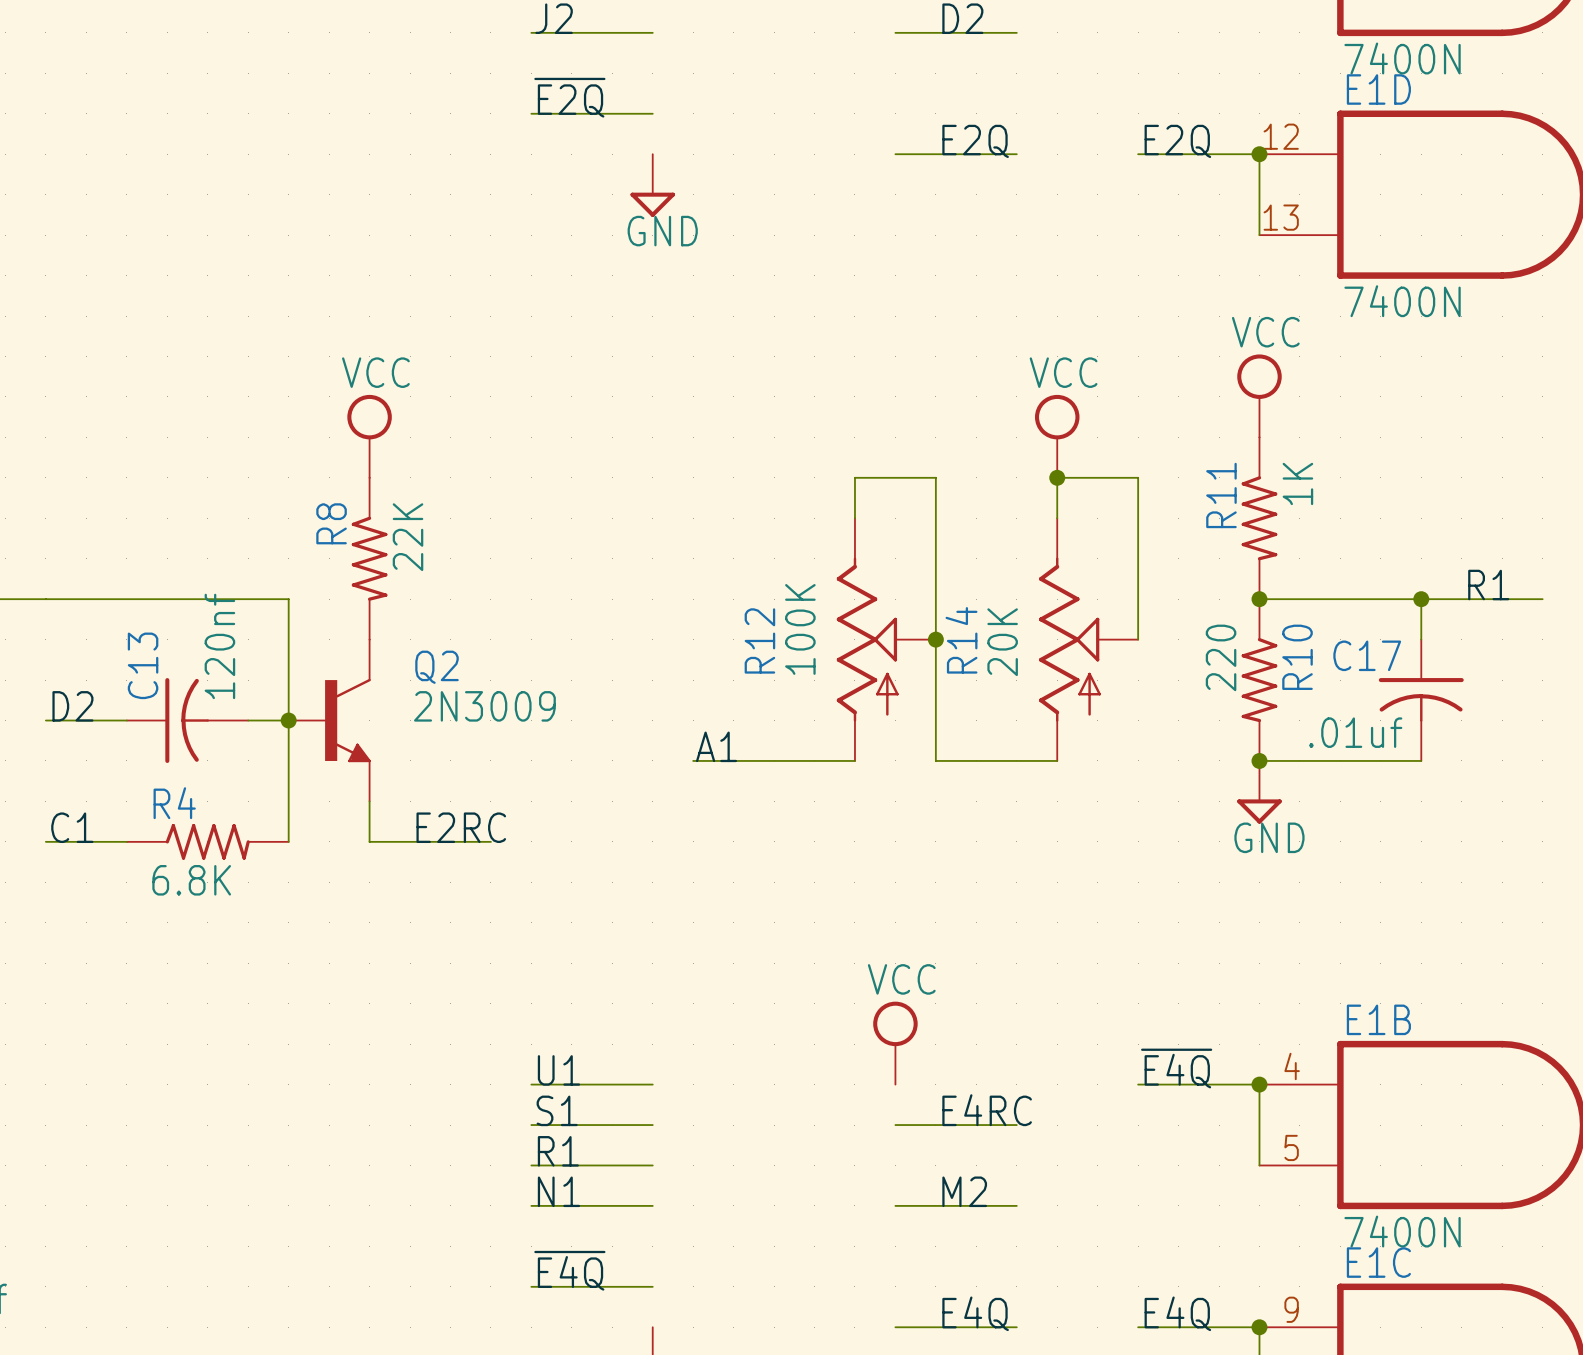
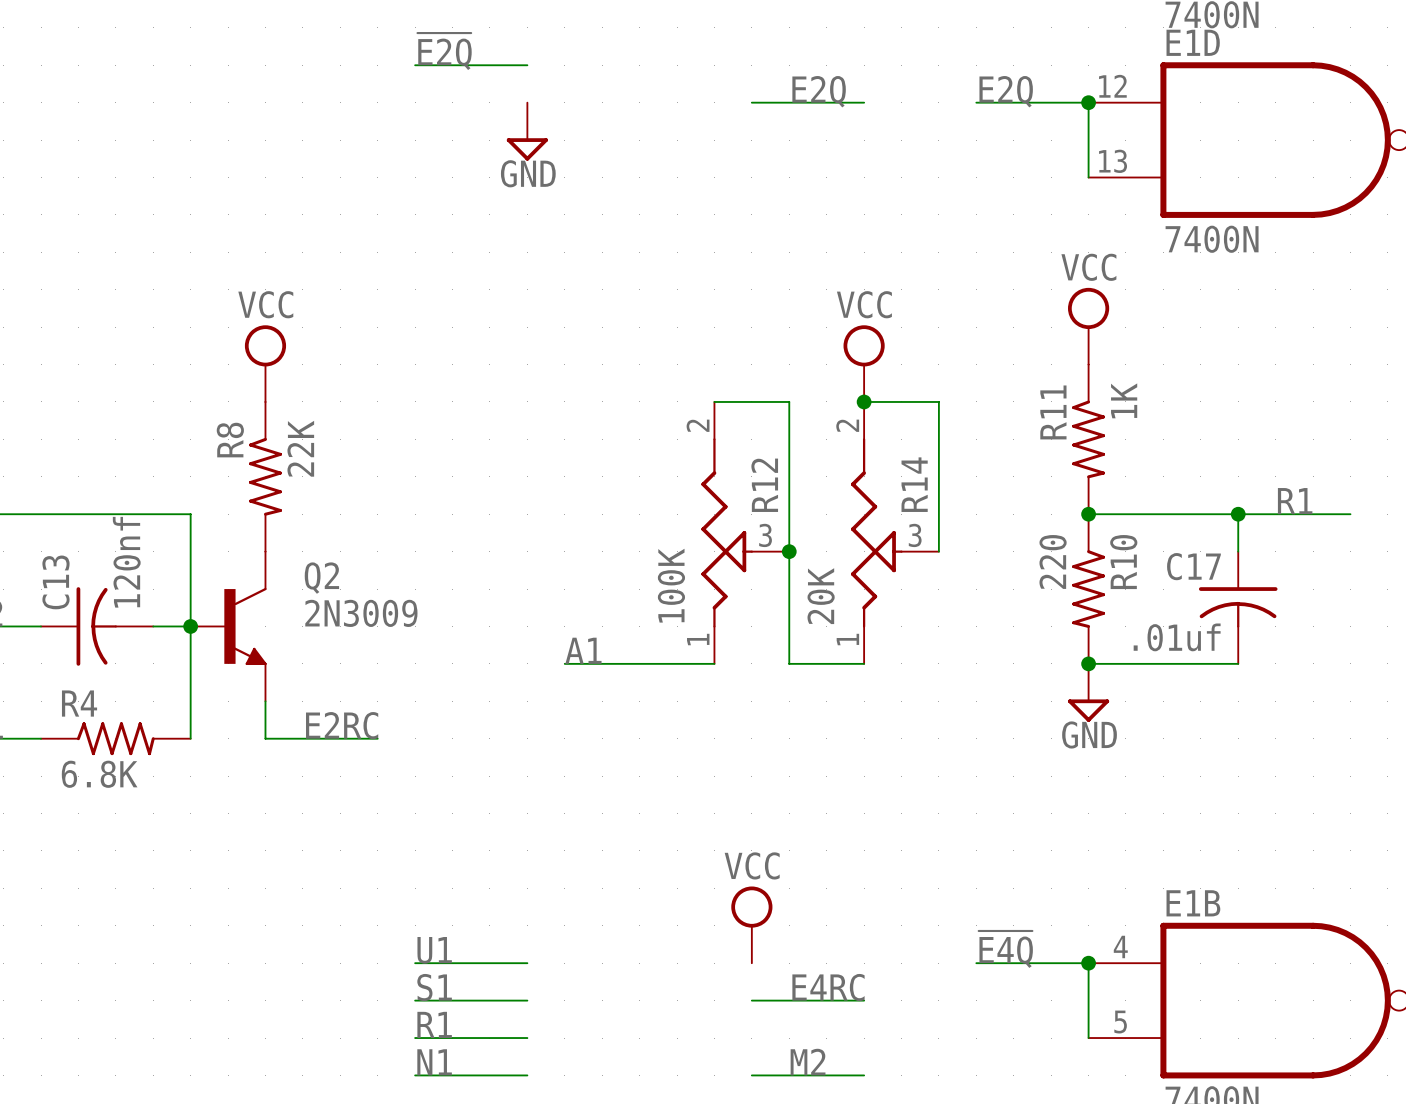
power symbol position: VCC (1057, 436) -> VCC (864, 363)
wire: (1057, 477) (1057, 518) -> (901, 401) (864, 401)
junction position: (1057, 477) -> (864, 401)
wire: (1097, 477) (1138, 477) (1138, 639) -> (938, 401) (938, 551)
R12 symbol: [836, 518, 936, 761] -> [701, 401, 790, 664]
R14 symbol: [1039, 518, 1139, 761] -> [851, 401, 939, 664]
R12 value position: 100K (800, 629) -> 100K (671, 585)
R12 name position: R12 (759, 640) -> R12 (764, 485)
R14 name position: R14 (961, 640) -> R14 (914, 484)
R14 value position: 20K (1002, 642) -> 20K (821, 596)
wire: (1016, 760) (1057, 760) -> none

